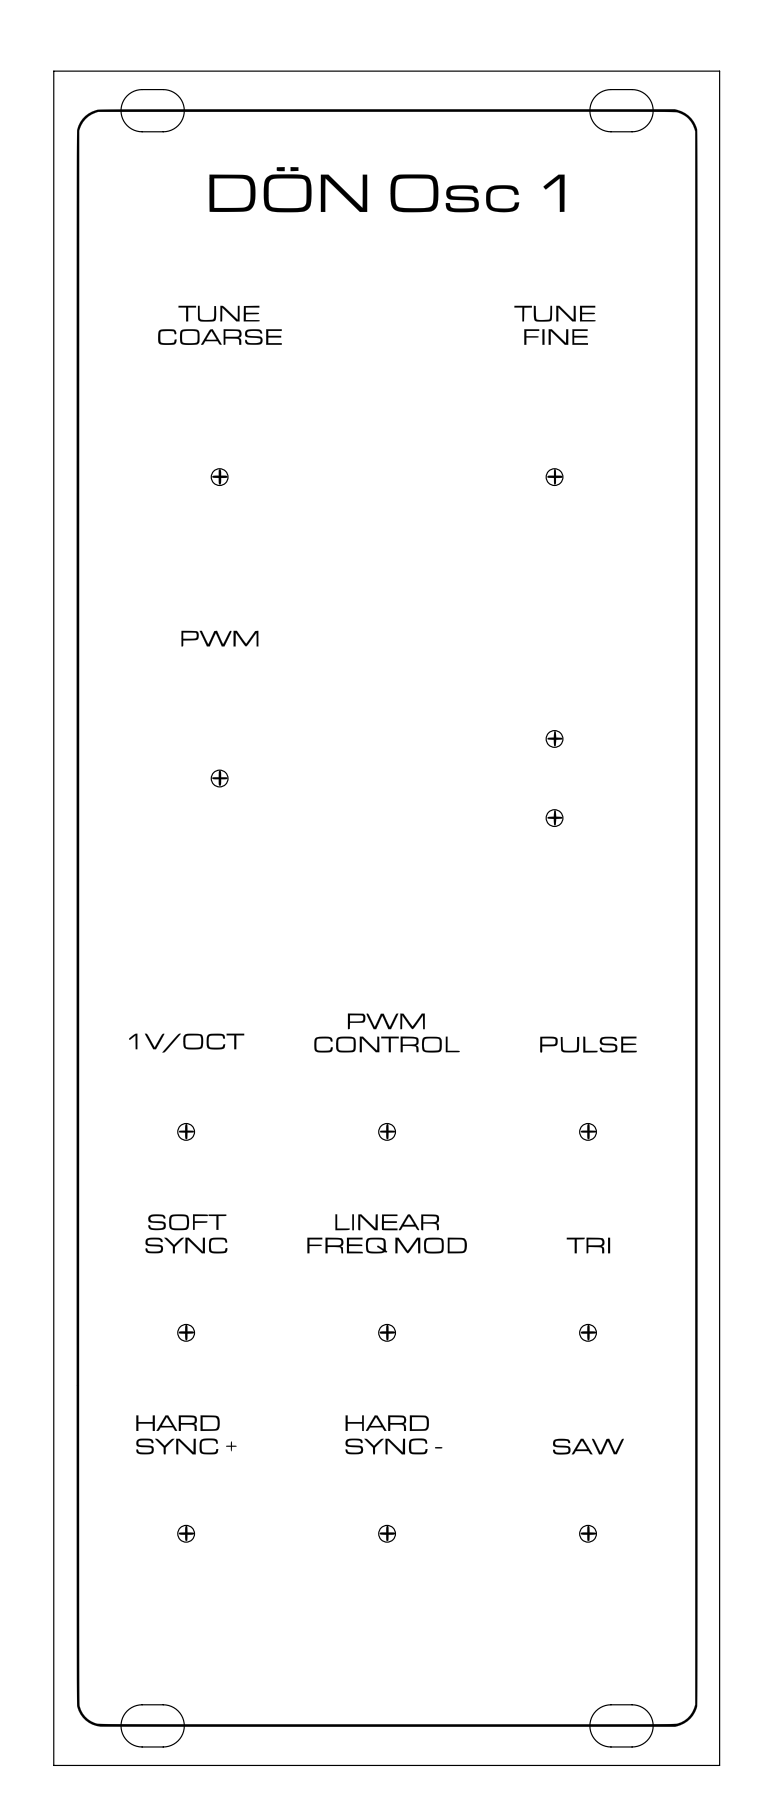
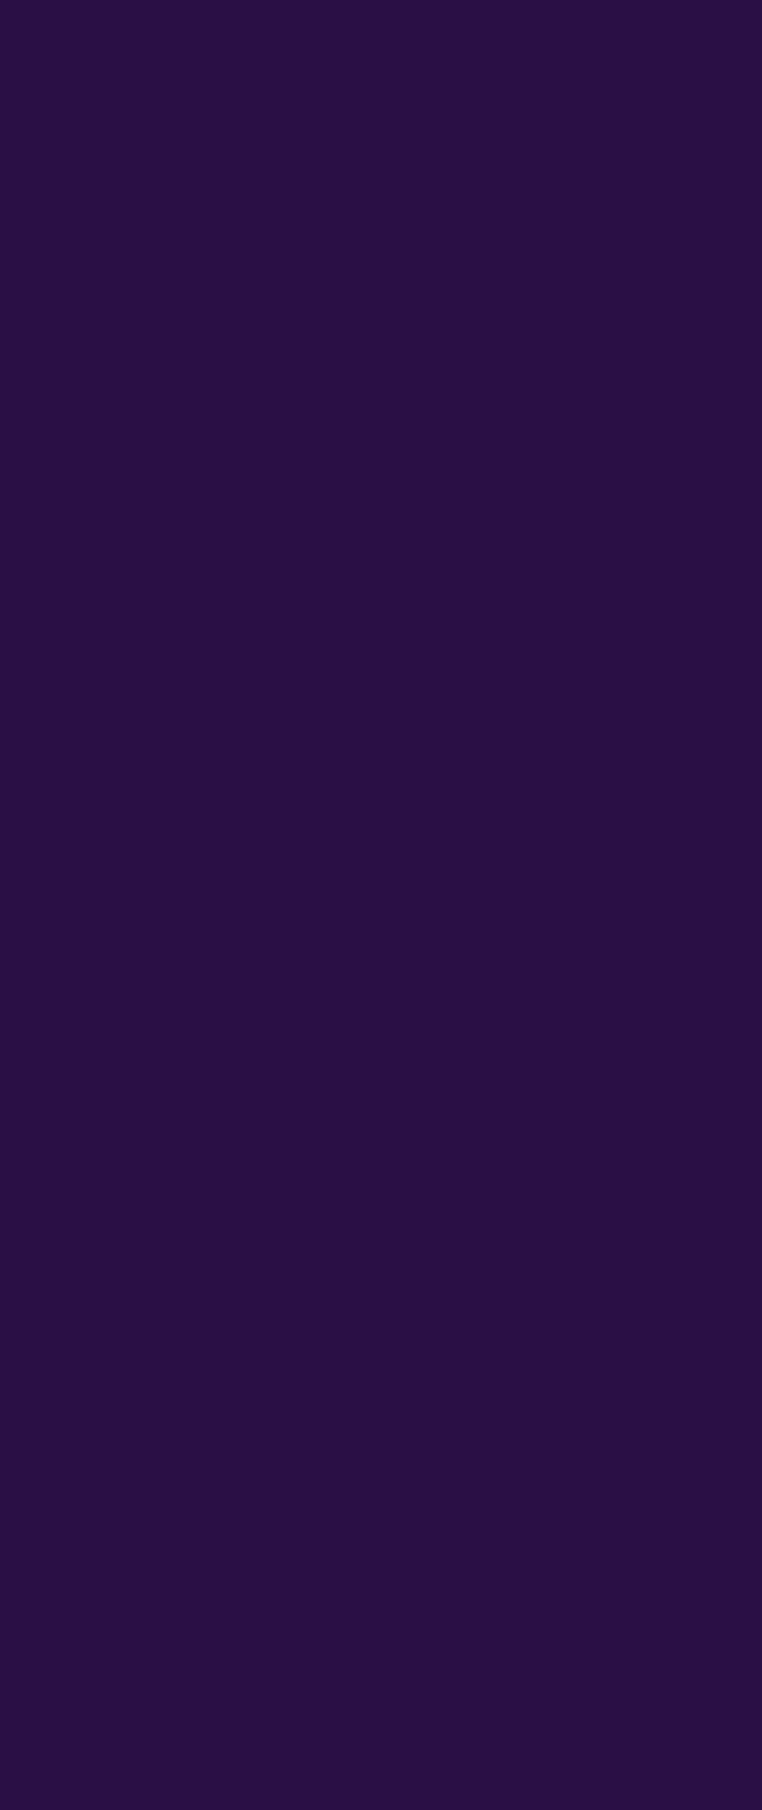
board edge: (53, 71) (53, 1765) (719, 1765) (719, 71) (53, 71) -> none
board edge: (142, 89) (165, 89) (178, 95) (182, 102) (184, 110) (182, 118) (178, 125) (171, 130) (163, 131) (139, 131) (127, 125) (121, 113) (122, 102) (131, 92) (142, 89) -> none
board edge: (610, 89) (634, 89) (646, 95) (651, 102) (653, 110) (651, 118) (646, 125) (640, 130) (632, 131) (608, 131) (596, 125) (590, 113) (591, 102) (600, 92) (610, 89) -> none
drawing: [76, 109, 698, 1727] -> none
round board edge: [210, 468, 229, 486] -> none
round board edge: [545, 468, 564, 486] -> none
round board edge: [545, 730, 564, 748] -> none
round board edge: [210, 769, 229, 788] -> none
round board edge: [545, 809, 564, 827] -> none
round board edge: [177, 1123, 195, 1141] -> none
round board edge: [378, 1123, 396, 1141] -> none
round board edge: [579, 1123, 597, 1141] -> none
round board edge: [177, 1324, 195, 1342] -> none
round board edge: [378, 1324, 396, 1342] -> none
round board edge: [579, 1324, 597, 1342] -> none
round board edge: [177, 1525, 195, 1543] -> none
round board edge: [378, 1525, 396, 1543] -> none
round board edge: [579, 1525, 597, 1543] -> none
board edge: (142, 1704) (165, 1704) (178, 1710) (182, 1717) (184, 1725) (182, 1733) (178, 1740) (171, 1745) (163, 1746) (139, 1746) (127, 1740) (121, 1731) (122, 1717) (129, 1709) (142, 1704) -> none
board edge: (610, 1704) (634, 1704) (646, 1710) (651, 1717) (653, 1725) (651, 1733) (646, 1740) (640, 1745) (632, 1746) (608, 1746) (596, 1740) (590, 1731) (591, 1717) (598, 1709) (610, 1704) -> none

